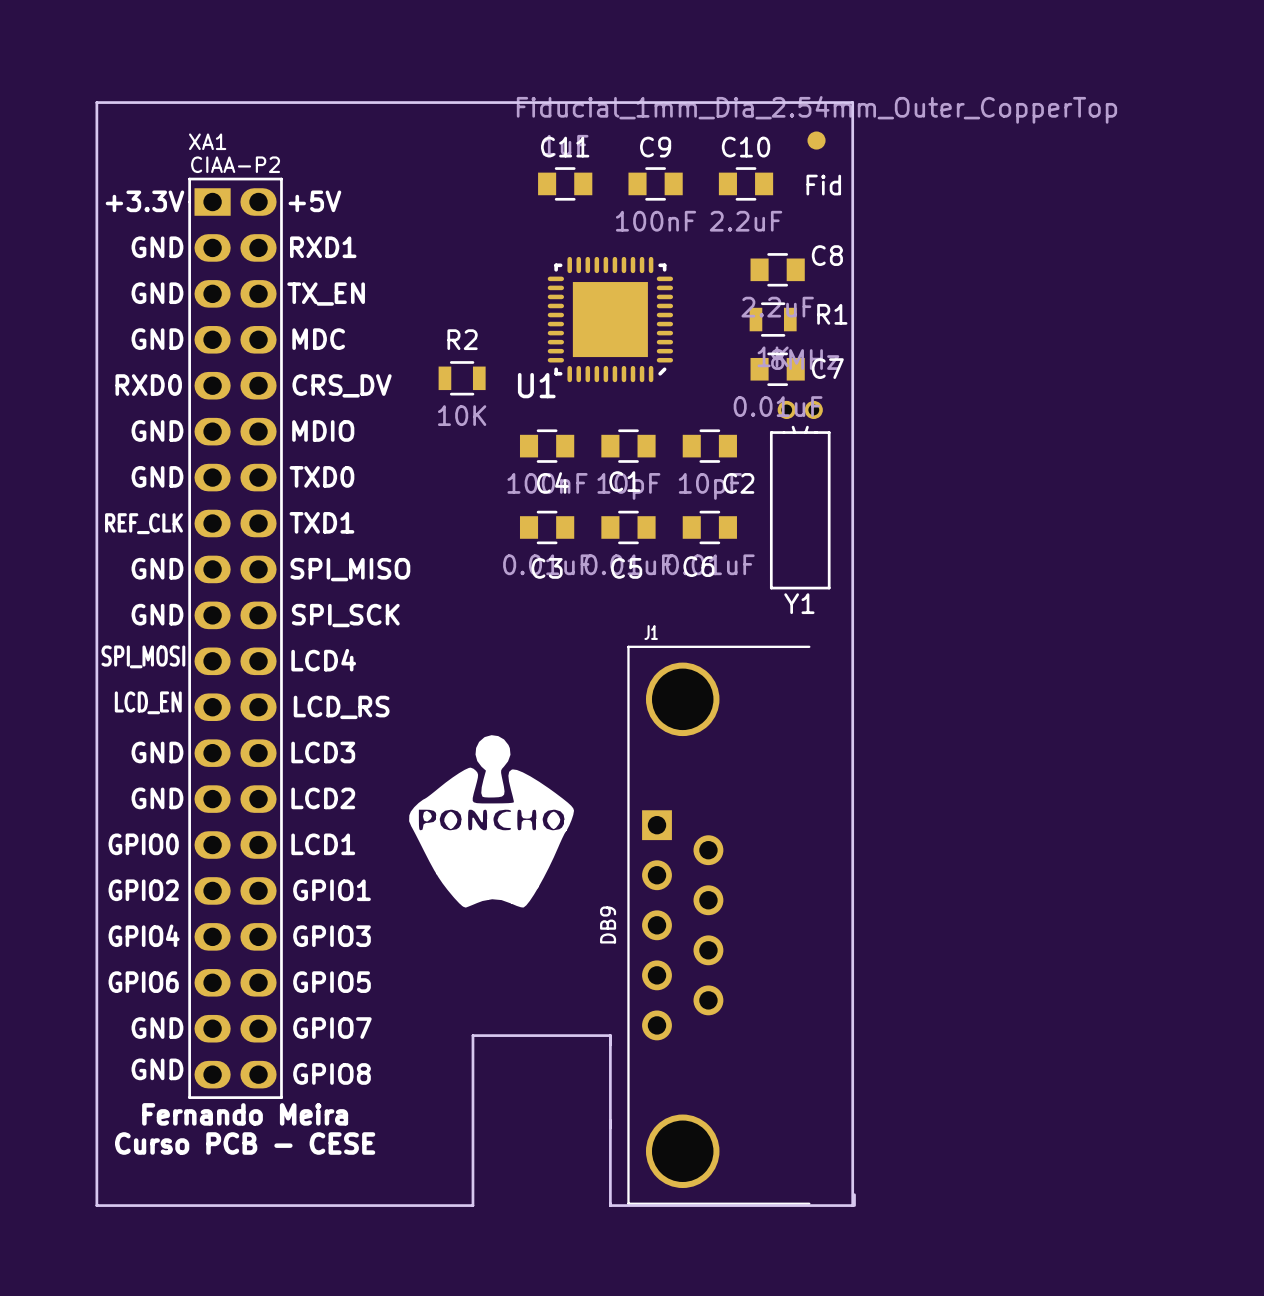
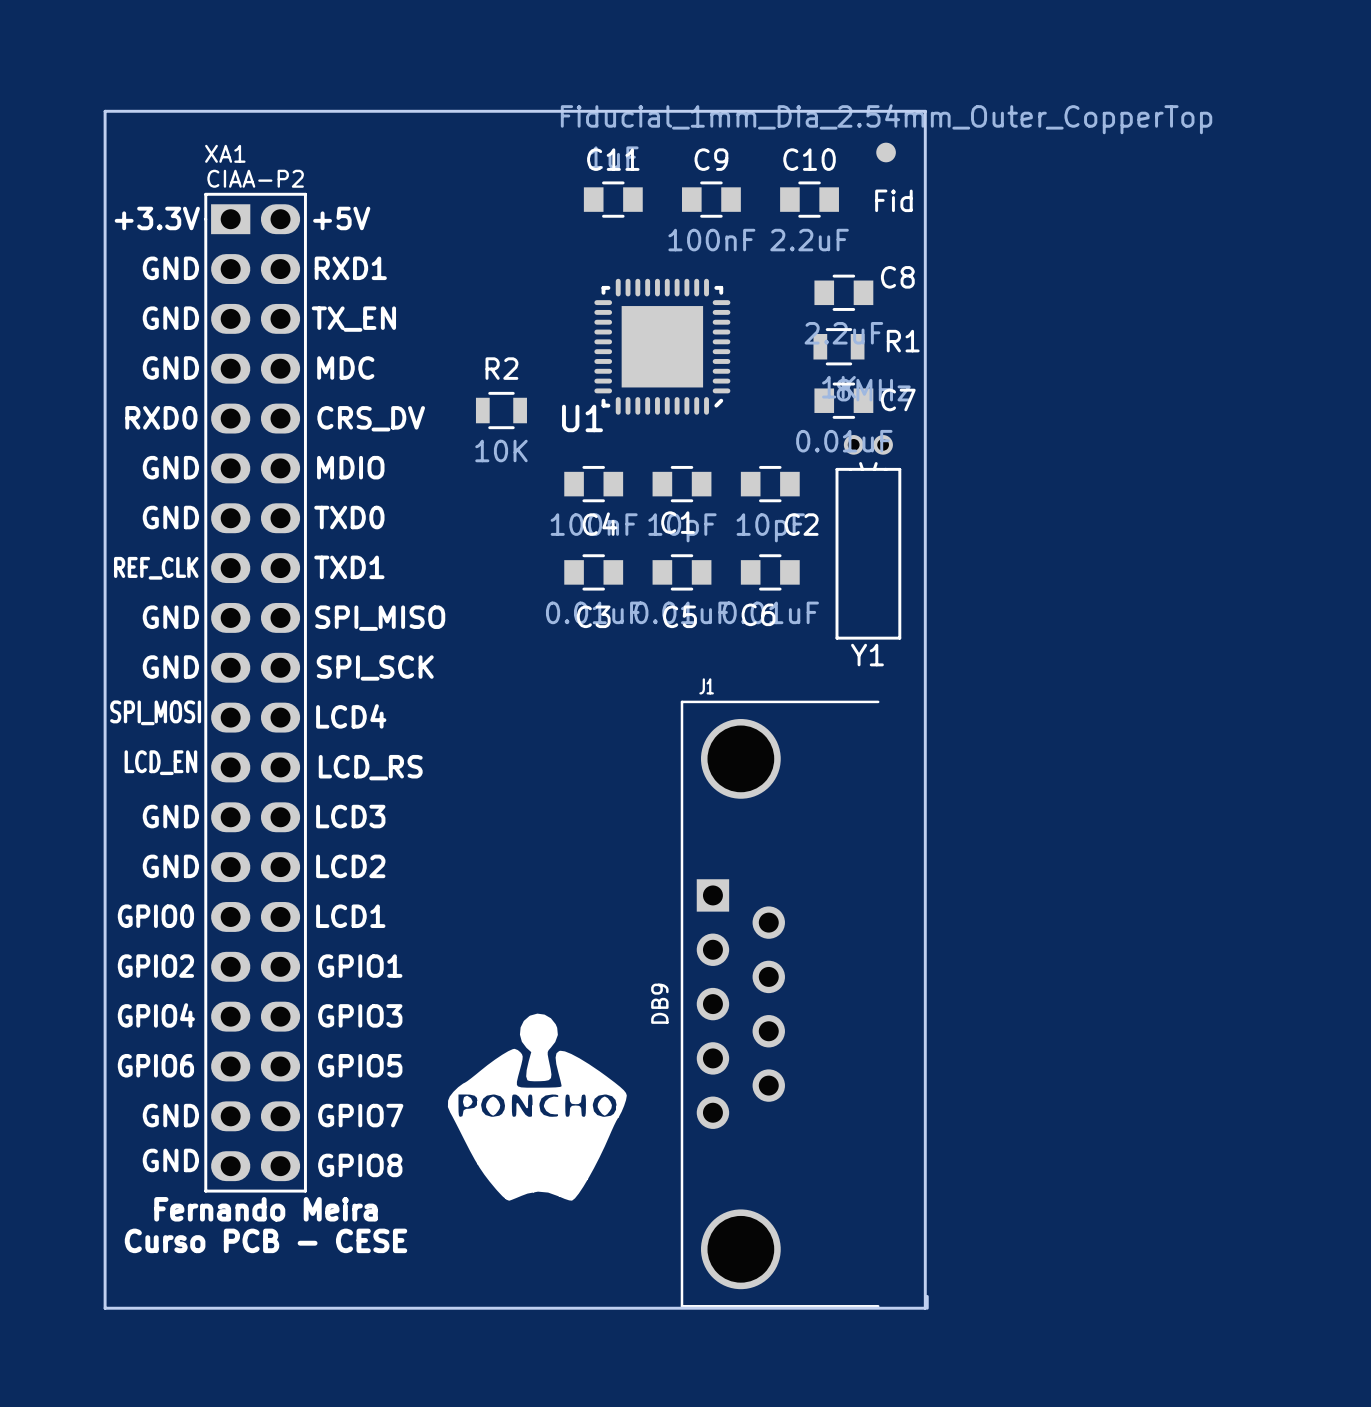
drawing position: (491, 821) -> (537, 1107)
board edge: (472, 1205) (472, 1035) (610, 1035) (610, 1205) -> (513, 1308) (662, 1308)

